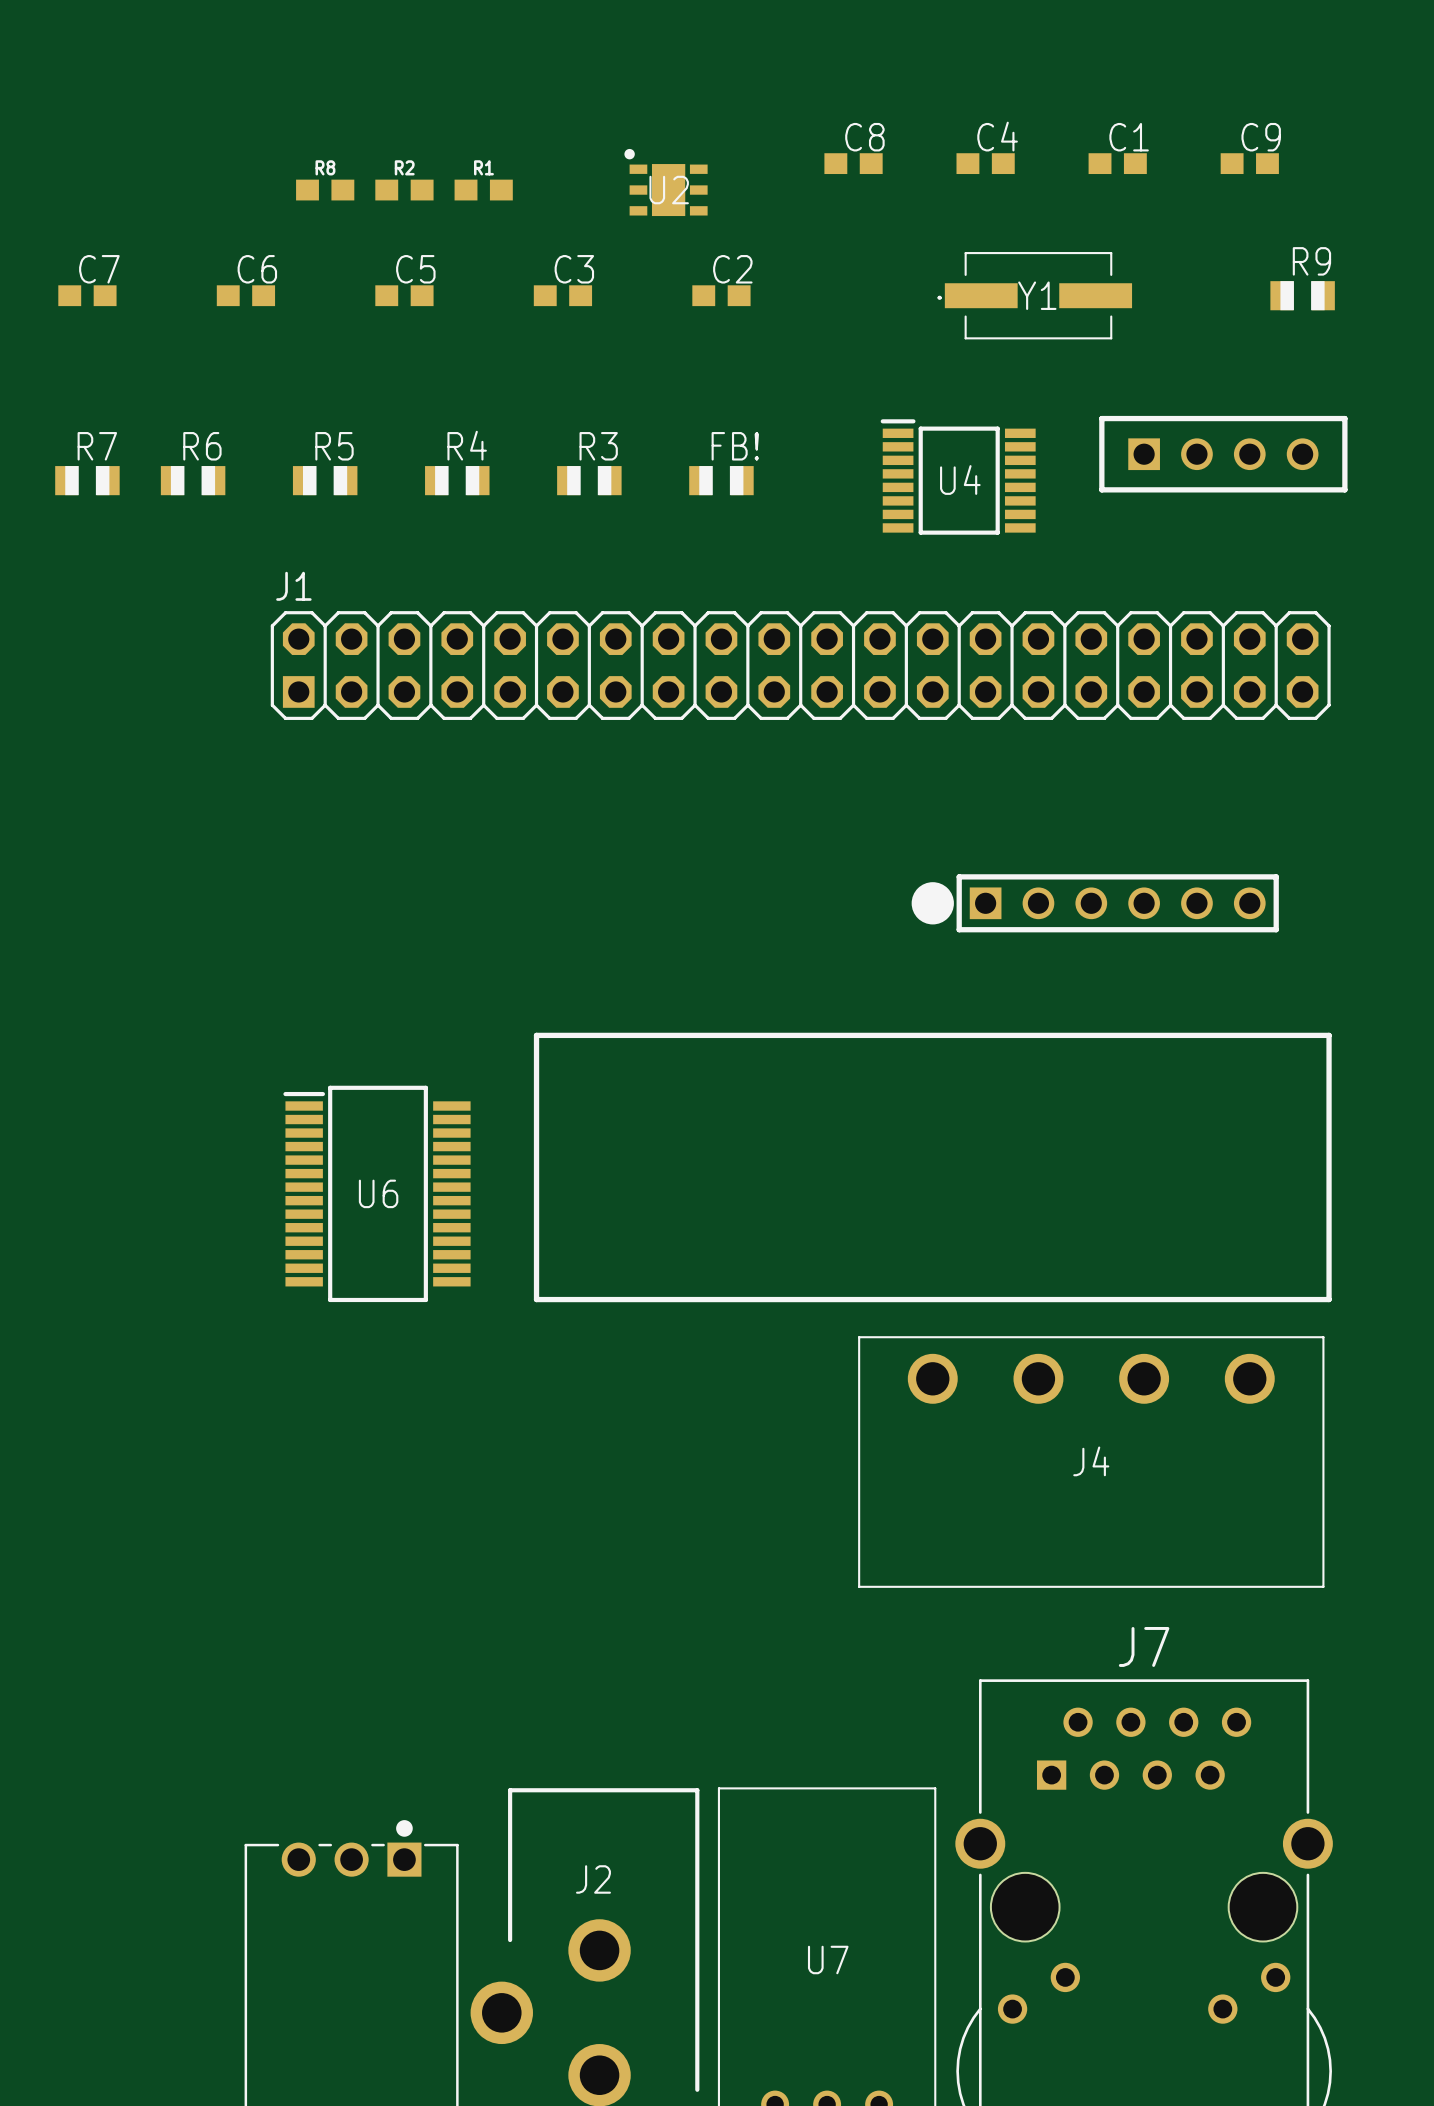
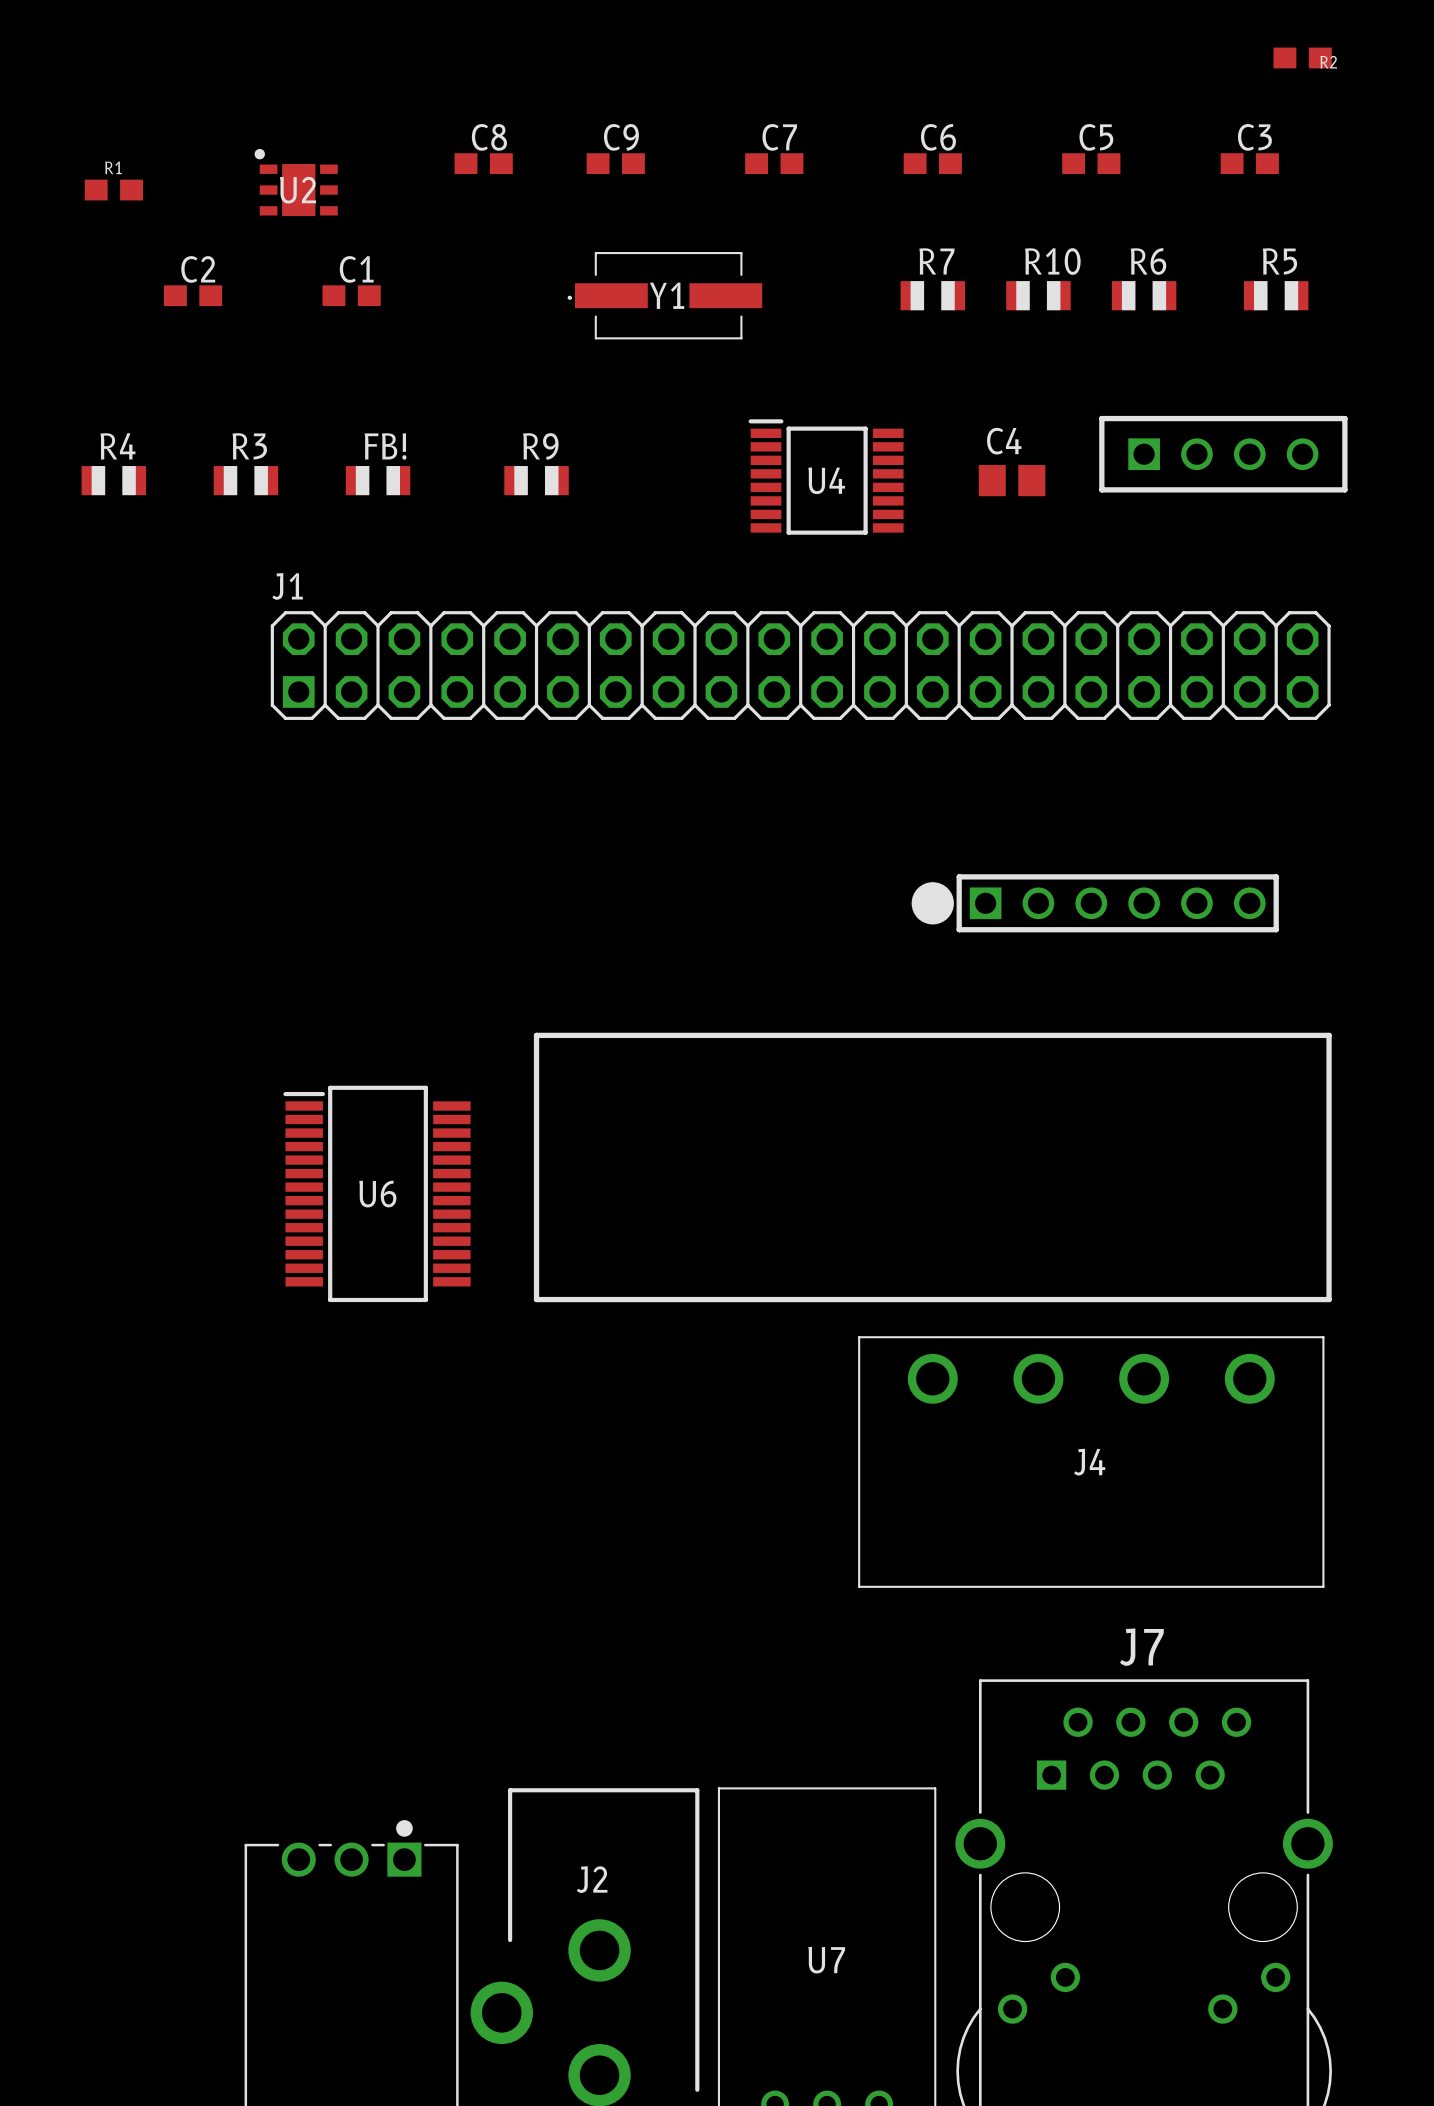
C9 name: C9 (1261, 137) -> C3 (1254, 137)
C4 footprint: [956, 153, 1015, 175] -> [978, 465, 1046, 497]
C9: none -> (615, 163)
C8 position: (853, 163) -> (483, 163)
C1 position: (1117, 163) -> (351, 295)
R2 name position: R2 (404, 167) -> R2 (1328, 62)
U2 position: (666, 182) -> (296, 182)
R8: (325, 190) -> none
R2 position: (404, 190) -> (1302, 57)
R1 position: (483, 190) -> (113, 190)
C7 position: (87, 295) -> (774, 163)
C6 position: (245, 295) -> (932, 163)
C5 position: (404, 295) -> (1091, 163)
C3: (562, 295) -> none
C2 position: (721, 295) -> (193, 295)
Y1 position: (1034, 295) -> (664, 295)
R10: none -> (1038, 295)
R9 position: (1302, 295) -> (536, 480)
U4 position: (958, 476) -> (826, 476)
R7 position: (87, 480) -> (932, 295)
R6 position: (193, 480) -> (1144, 295)
R5 position: (325, 480) -> (1276, 295)
R4 position: (457, 480) -> (113, 480)
R3 position: (589, 480) -> (245, 480)
FB! position: (721, 480) -> (378, 480)

